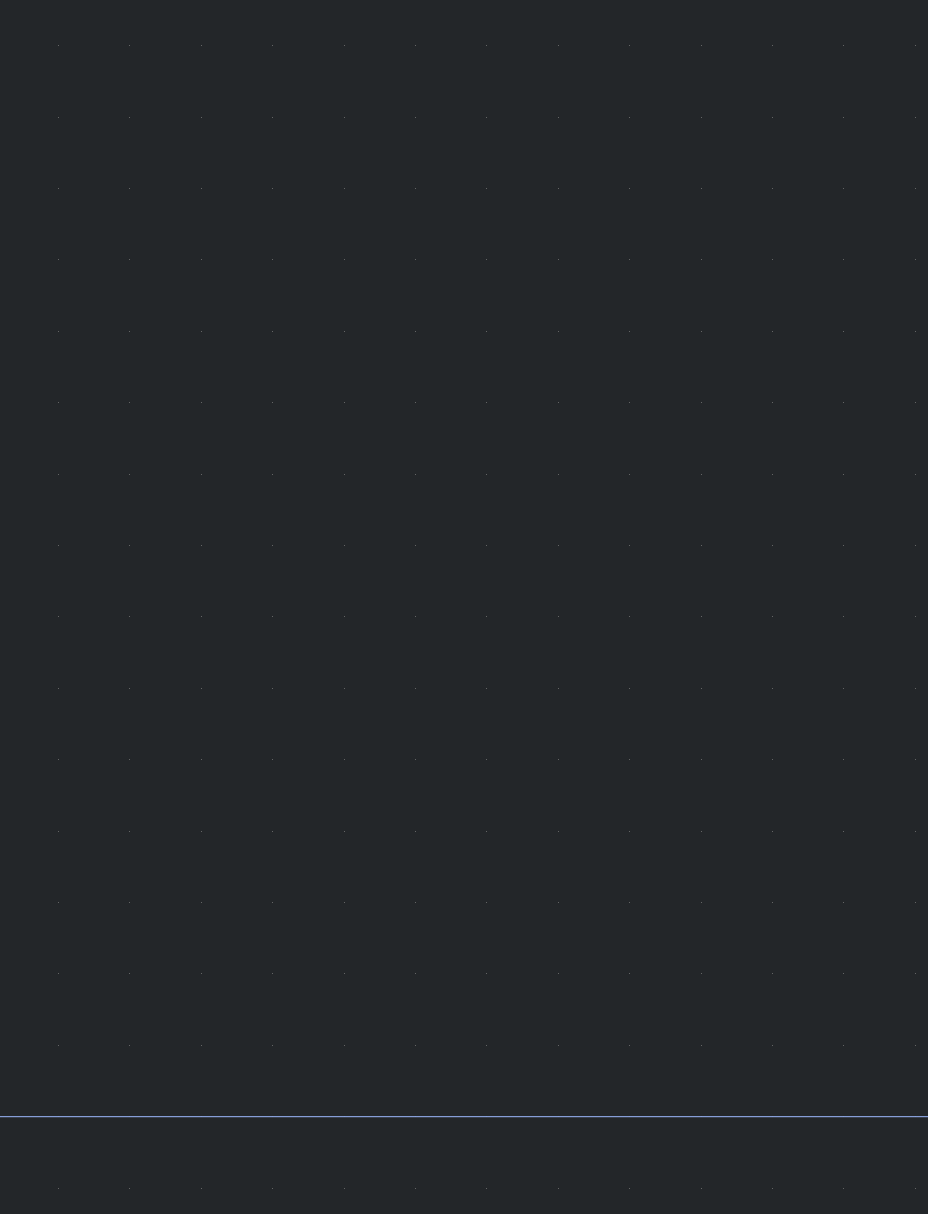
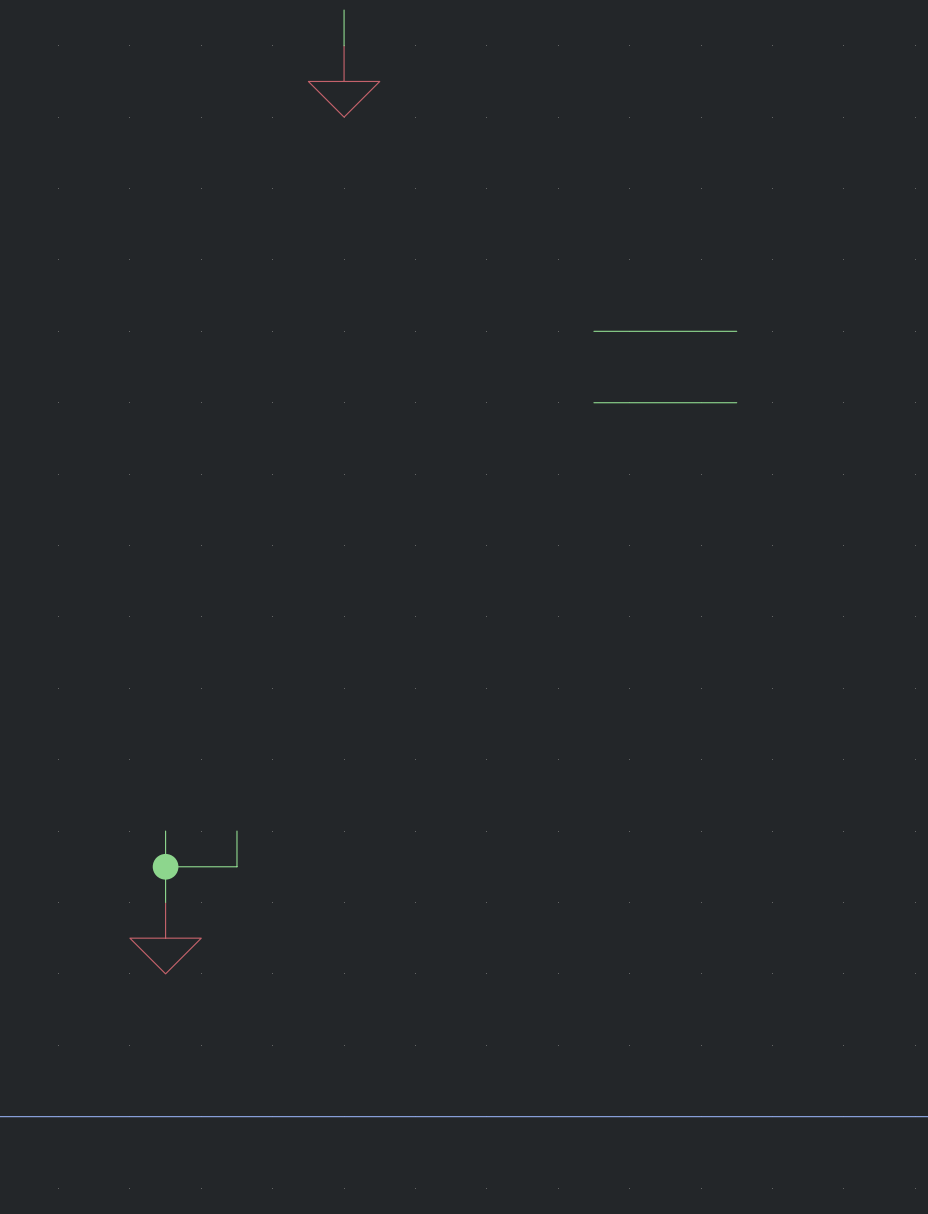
wire: none -> (344, 10) (344, 45)
power symbol: none -> (344, 81)
wire: none -> (593, 331) (736, 331)
wire: none -> (593, 402) (736, 402)
wire: none -> (165, 831) (165, 902)
wire: none -> (236, 831) (236, 866) (165, 866)
junction: none -> (165, 866)
power symbol: none -> (165, 938)

